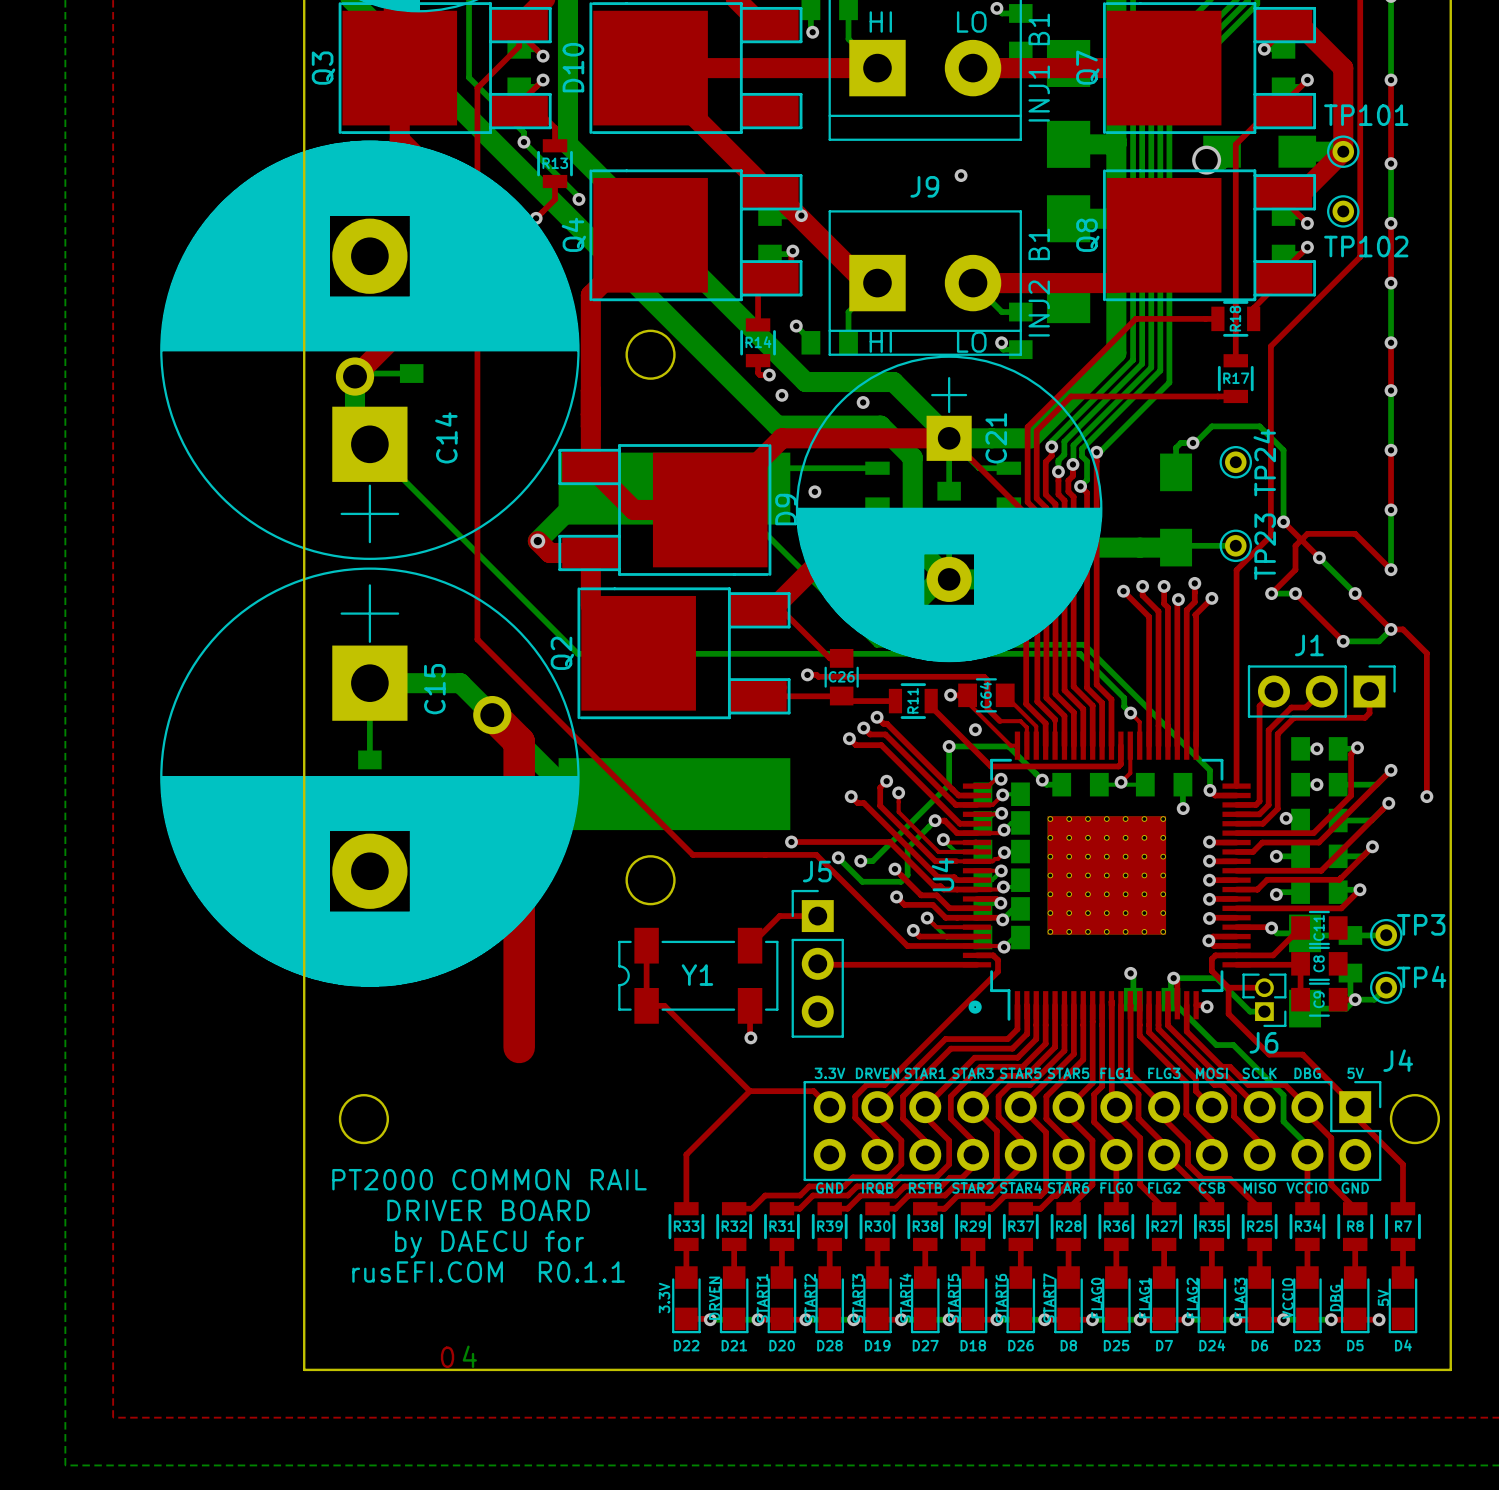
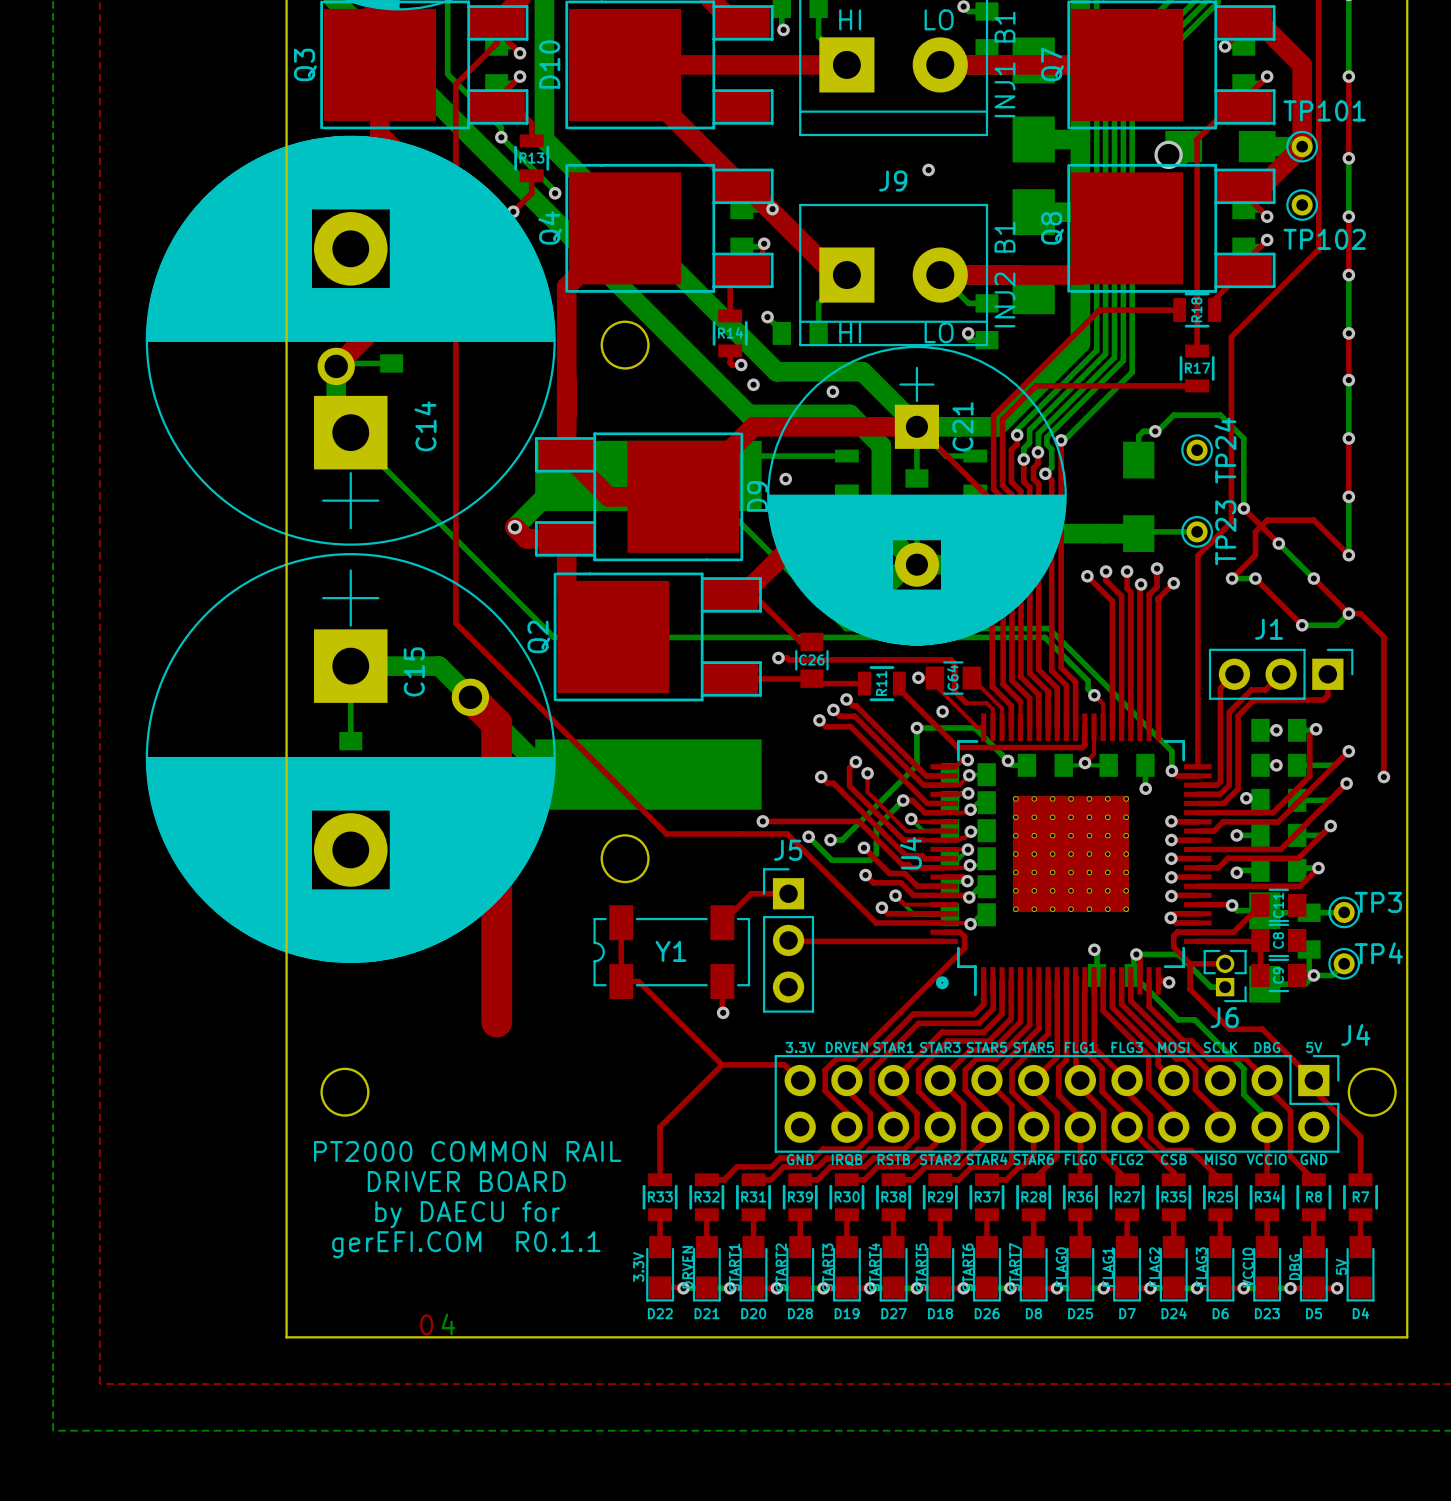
text: rusEFI.COM R0.1.1 (488, 1272) -> gerEFI.COM R0.1.1 (466, 1244)

